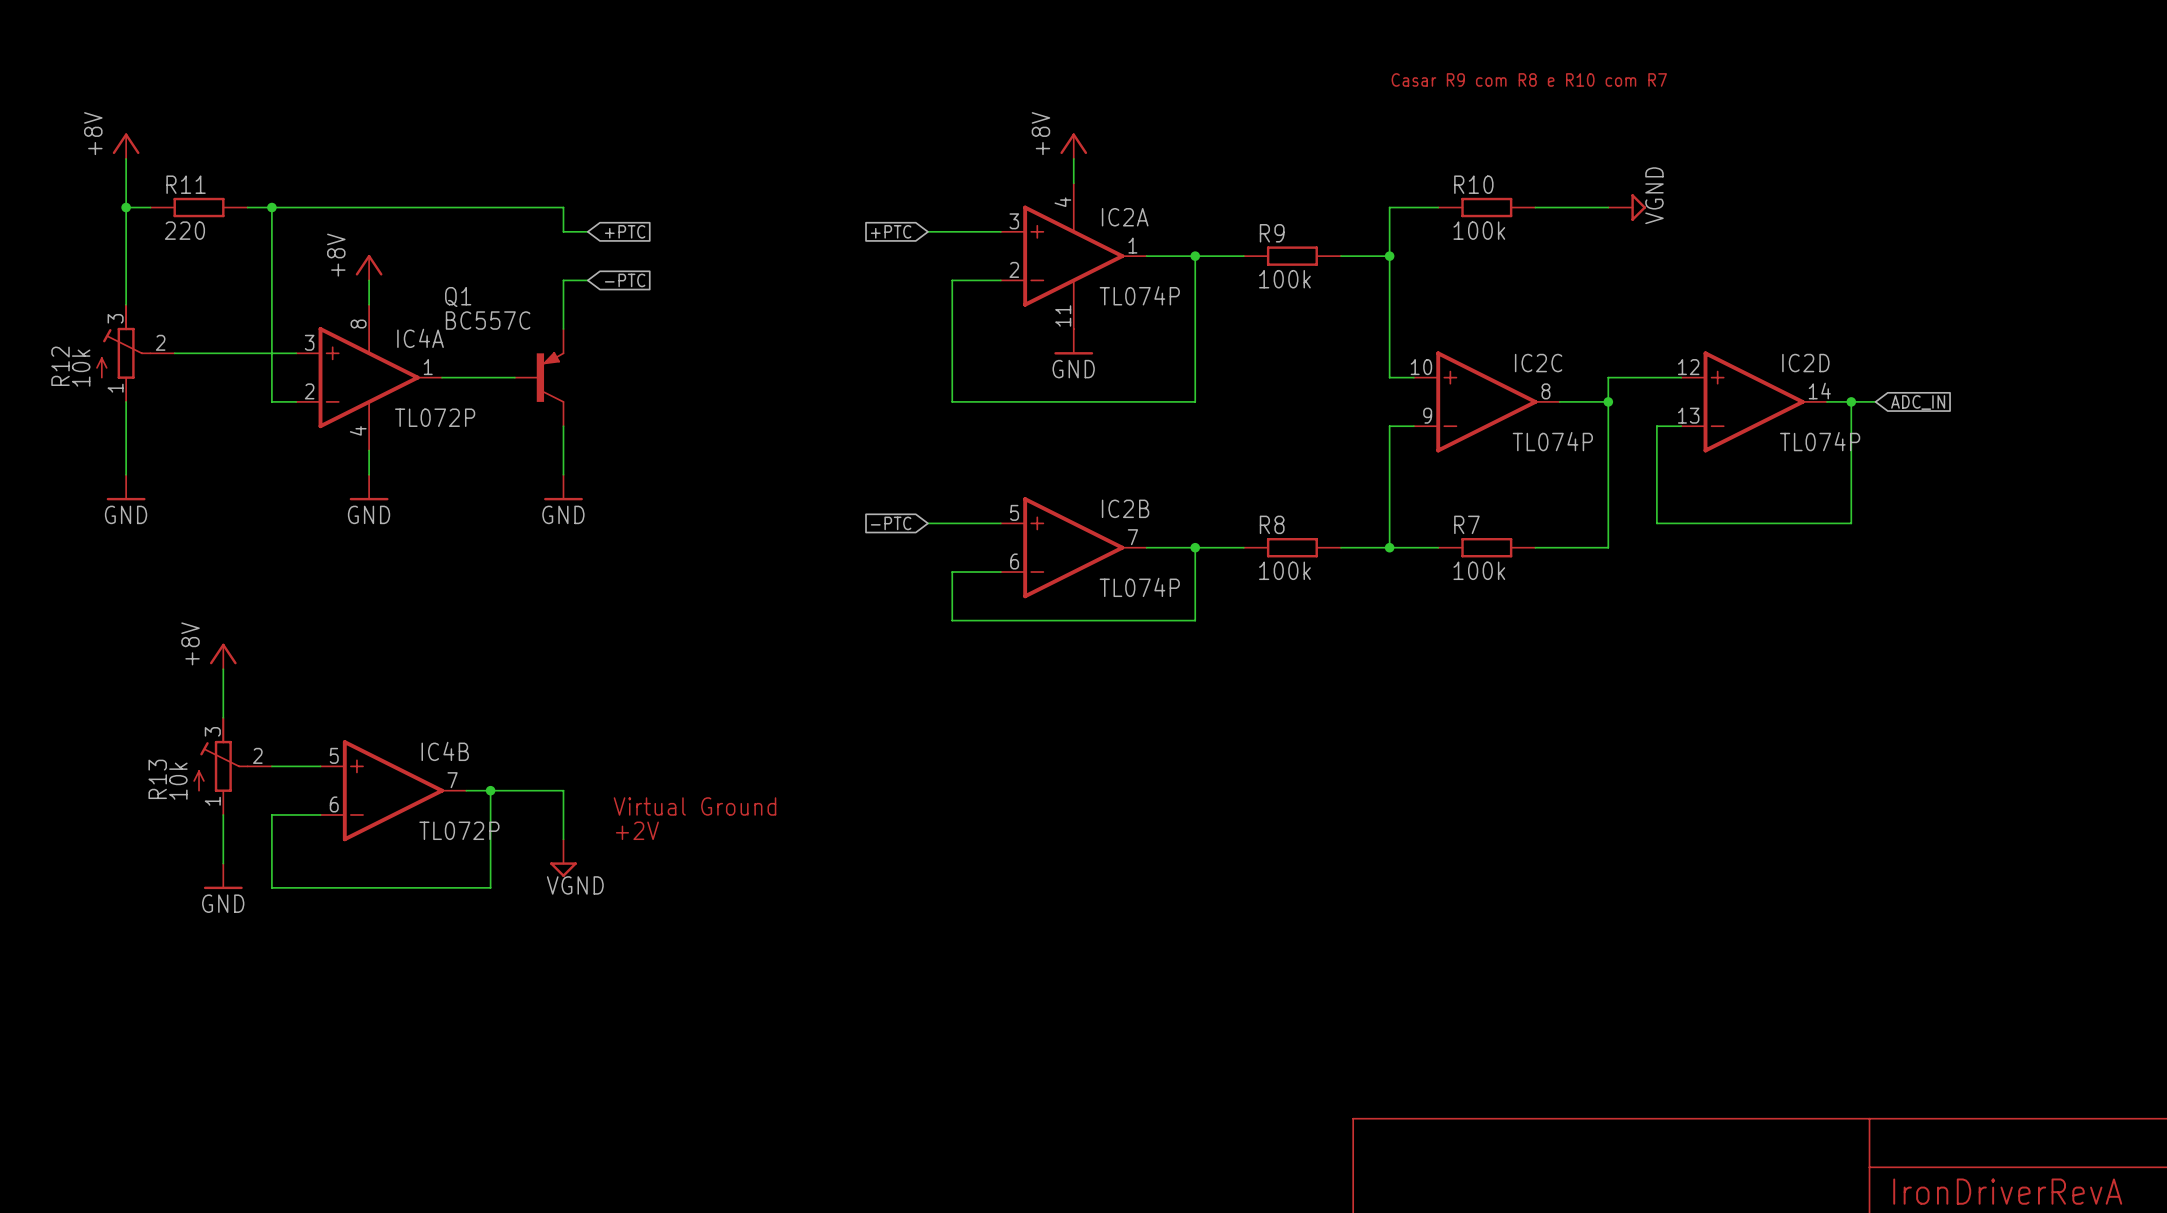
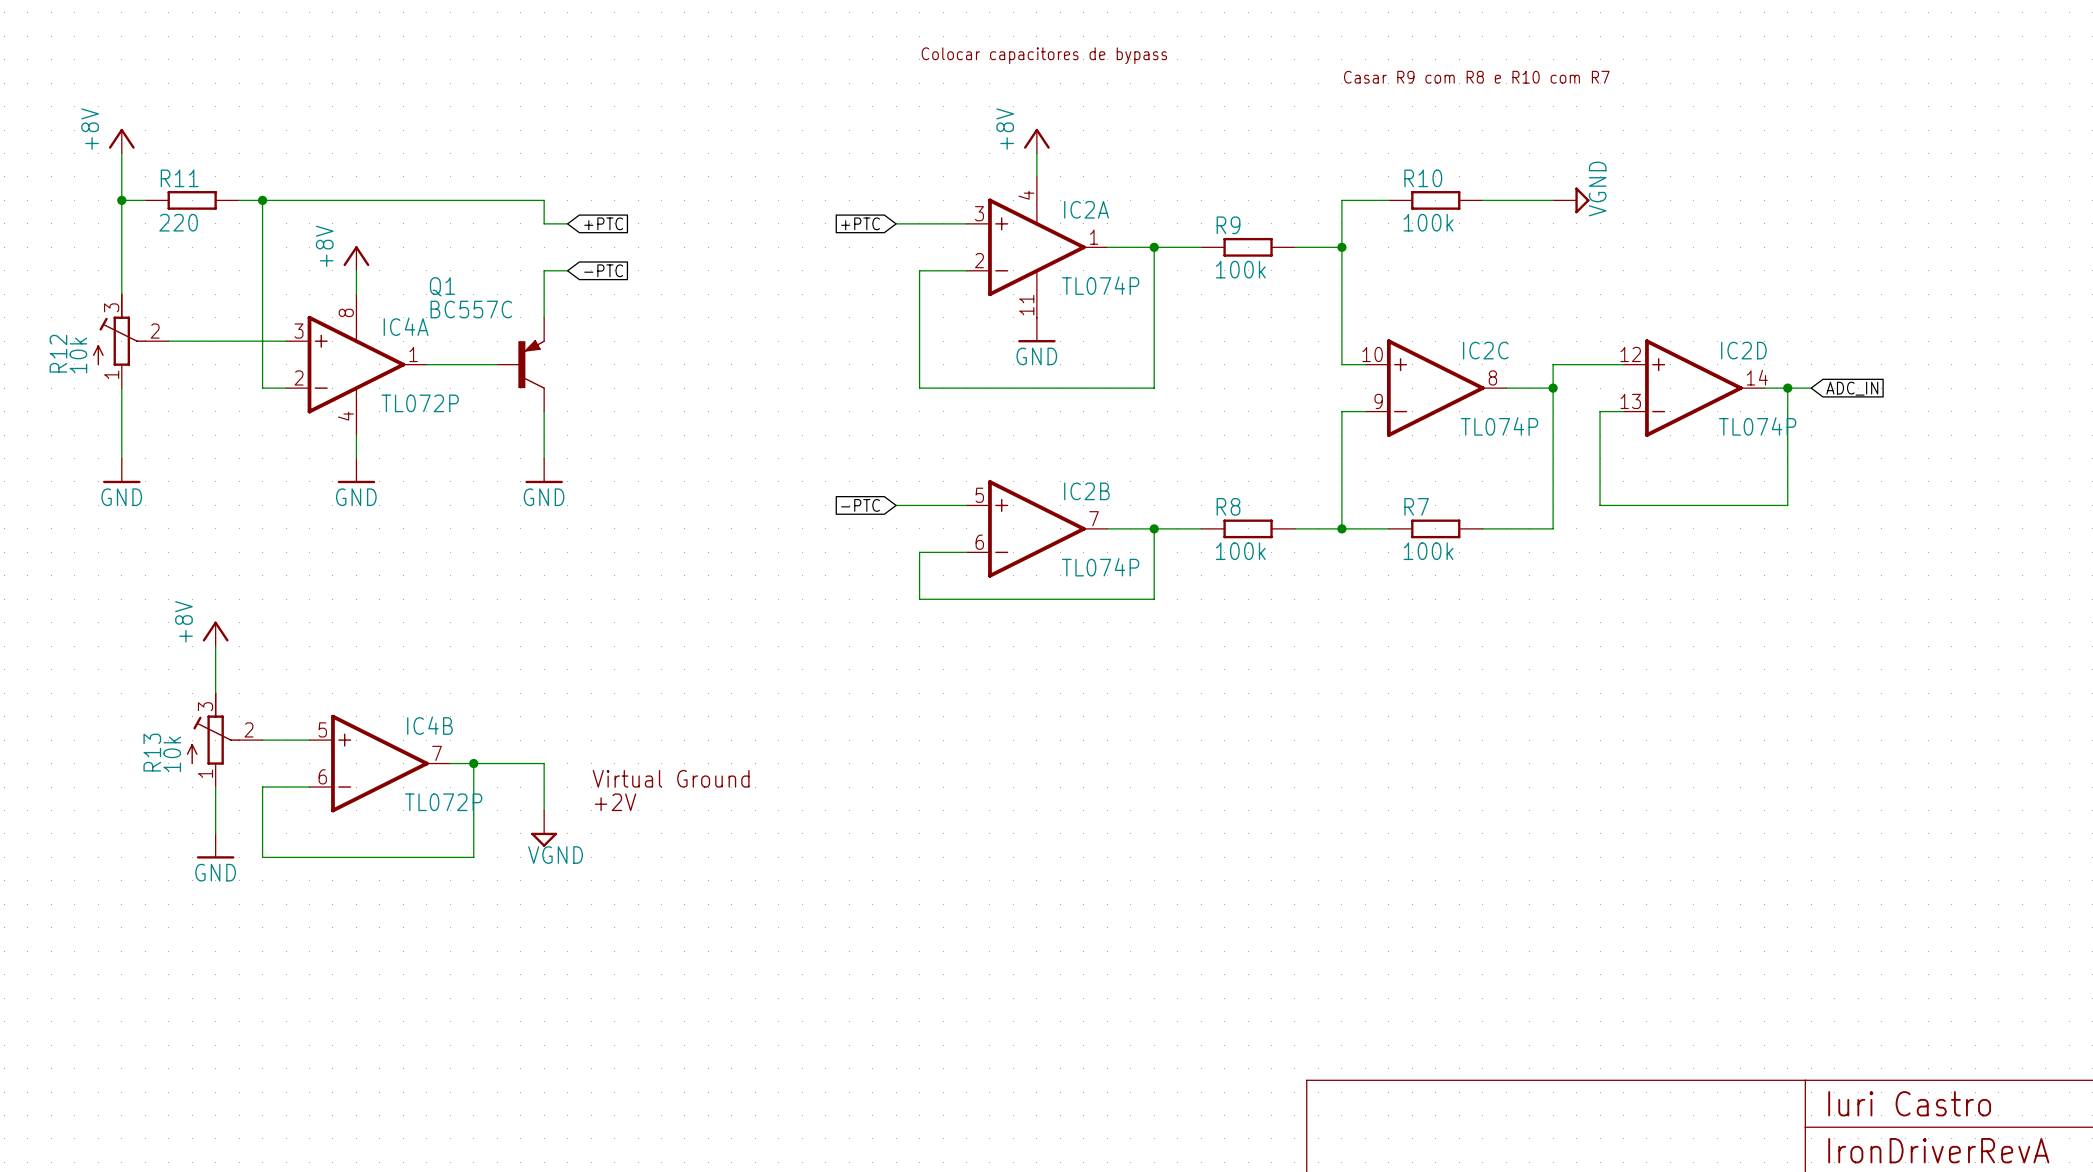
text: none -> Colocar capacitores de bypass (1044, 55)
text: none -> Iuri Castro (1909, 1103)

